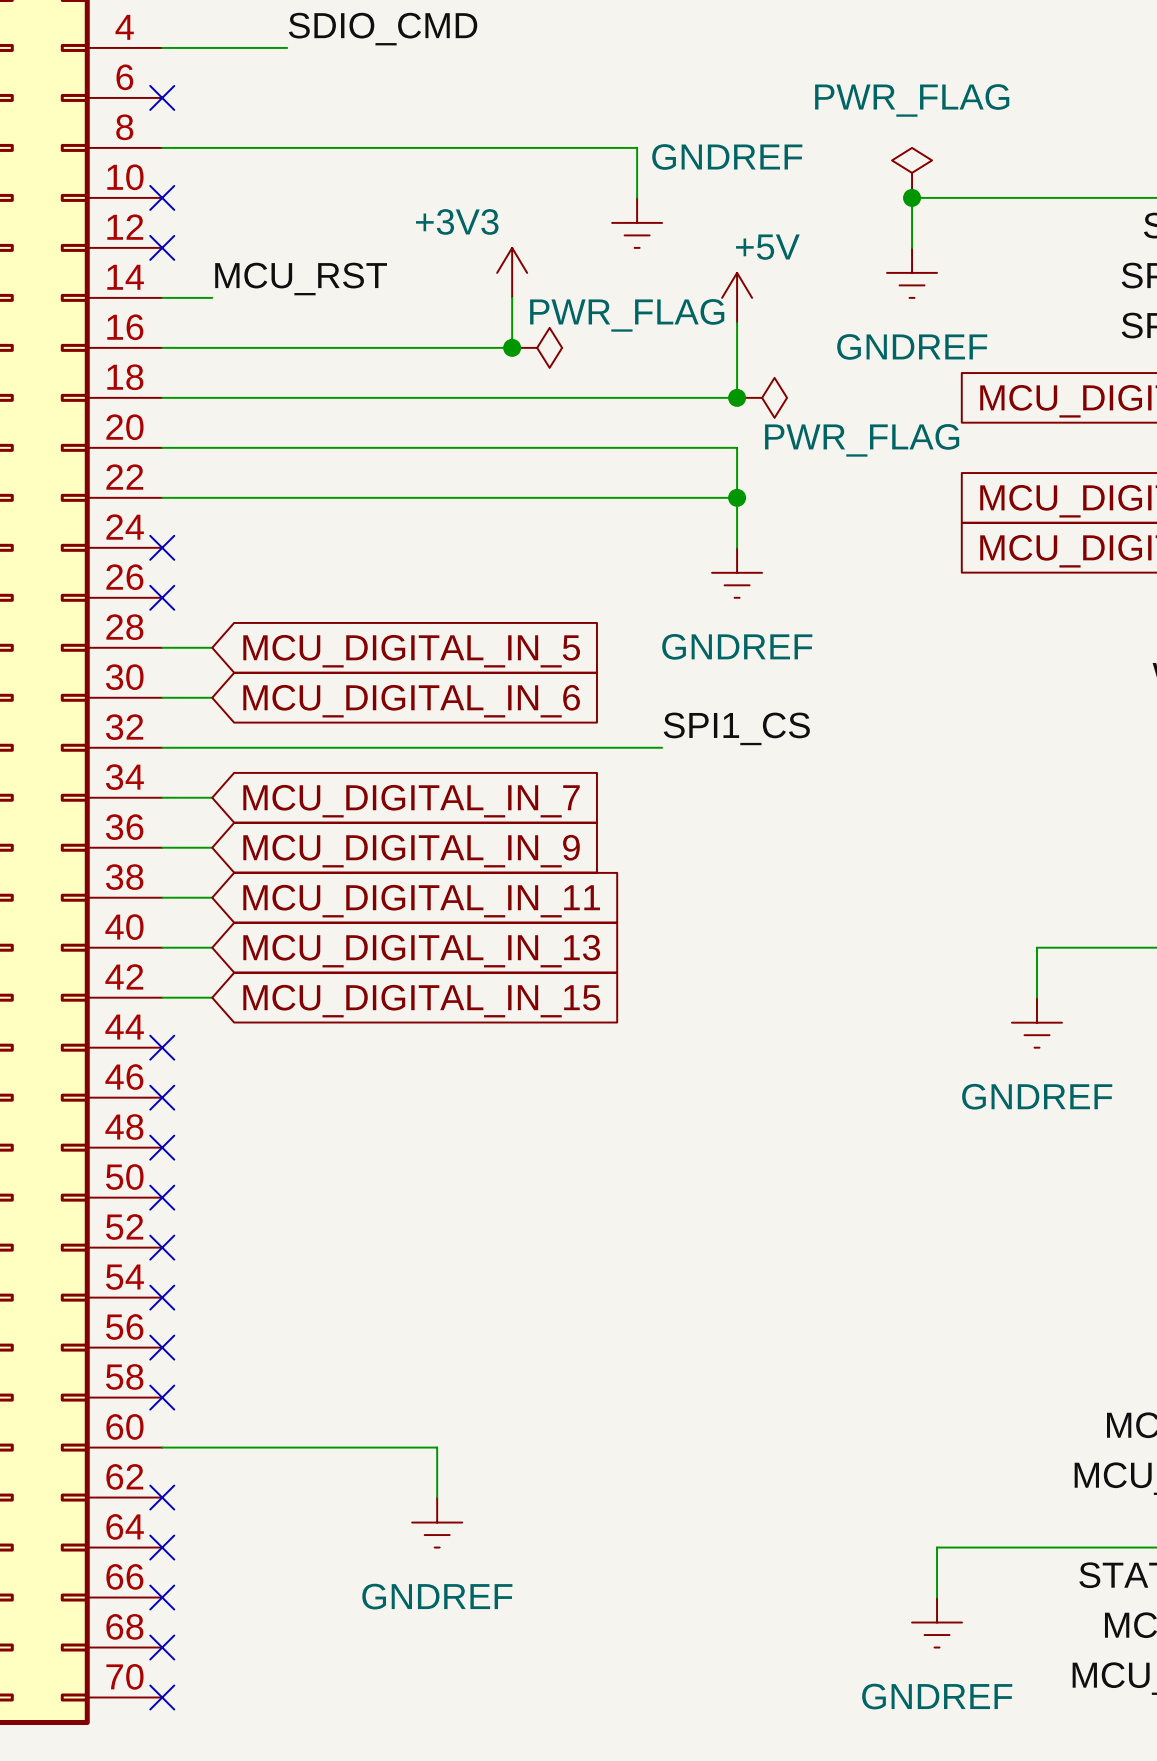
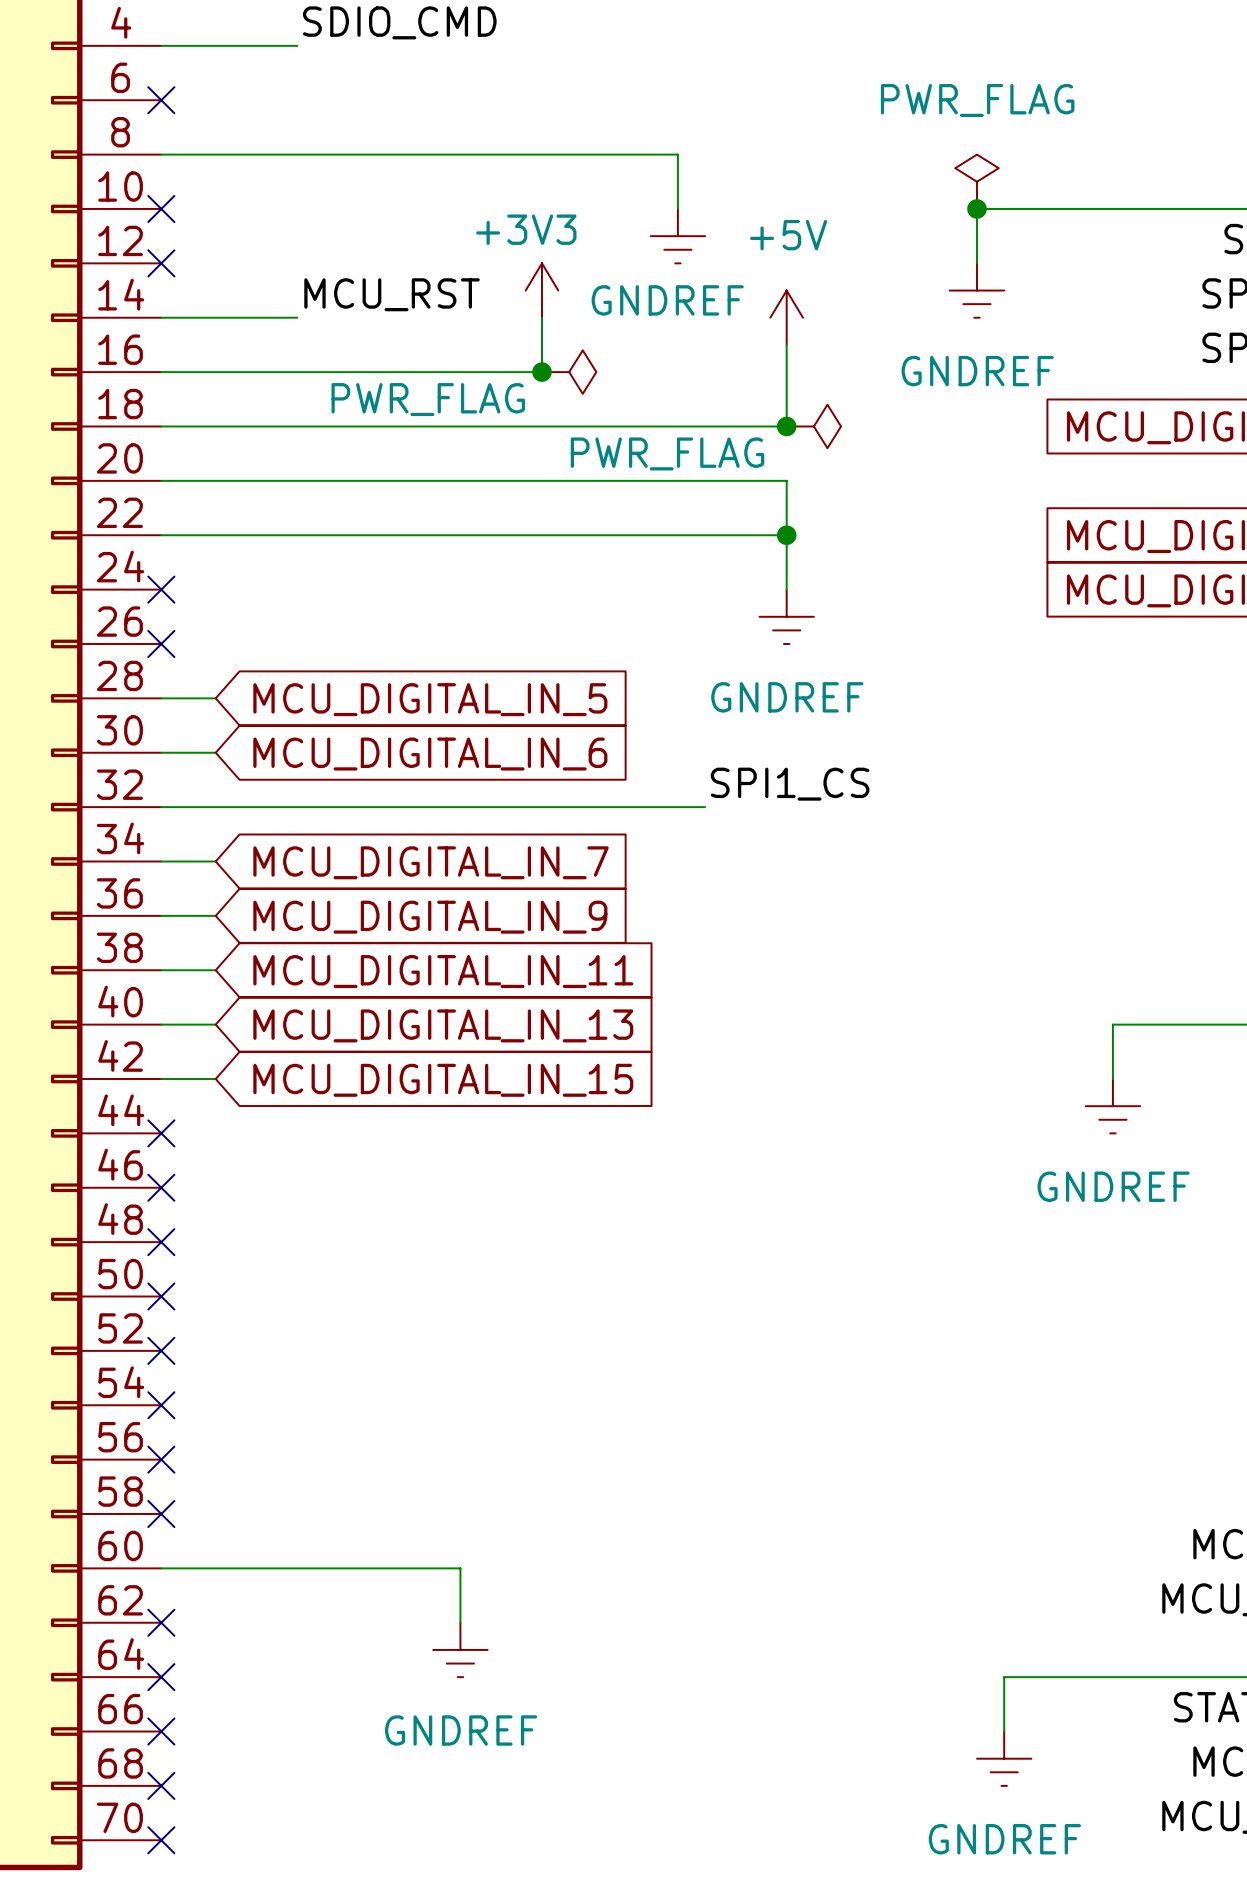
power symbol text position: GNDREF (727, 156) -> GNDREF (667, 300)
power symbol text position: +3V3 (457, 221) -> +3V3 (526, 229)
power symbol text position: +5V (767, 247) -> +5V (788, 235)
label position: MCU_RST (301, 279) -> MCU_RST (392, 294)
wire: none -> (215, 317) (297, 317)
power symbol text position: PWR_FLAG (627, 315) -> PWR_FLAG (428, 399)
power symbol text position: PWR_FLAG (862, 440) -> PWR_FLAG (667, 453)

